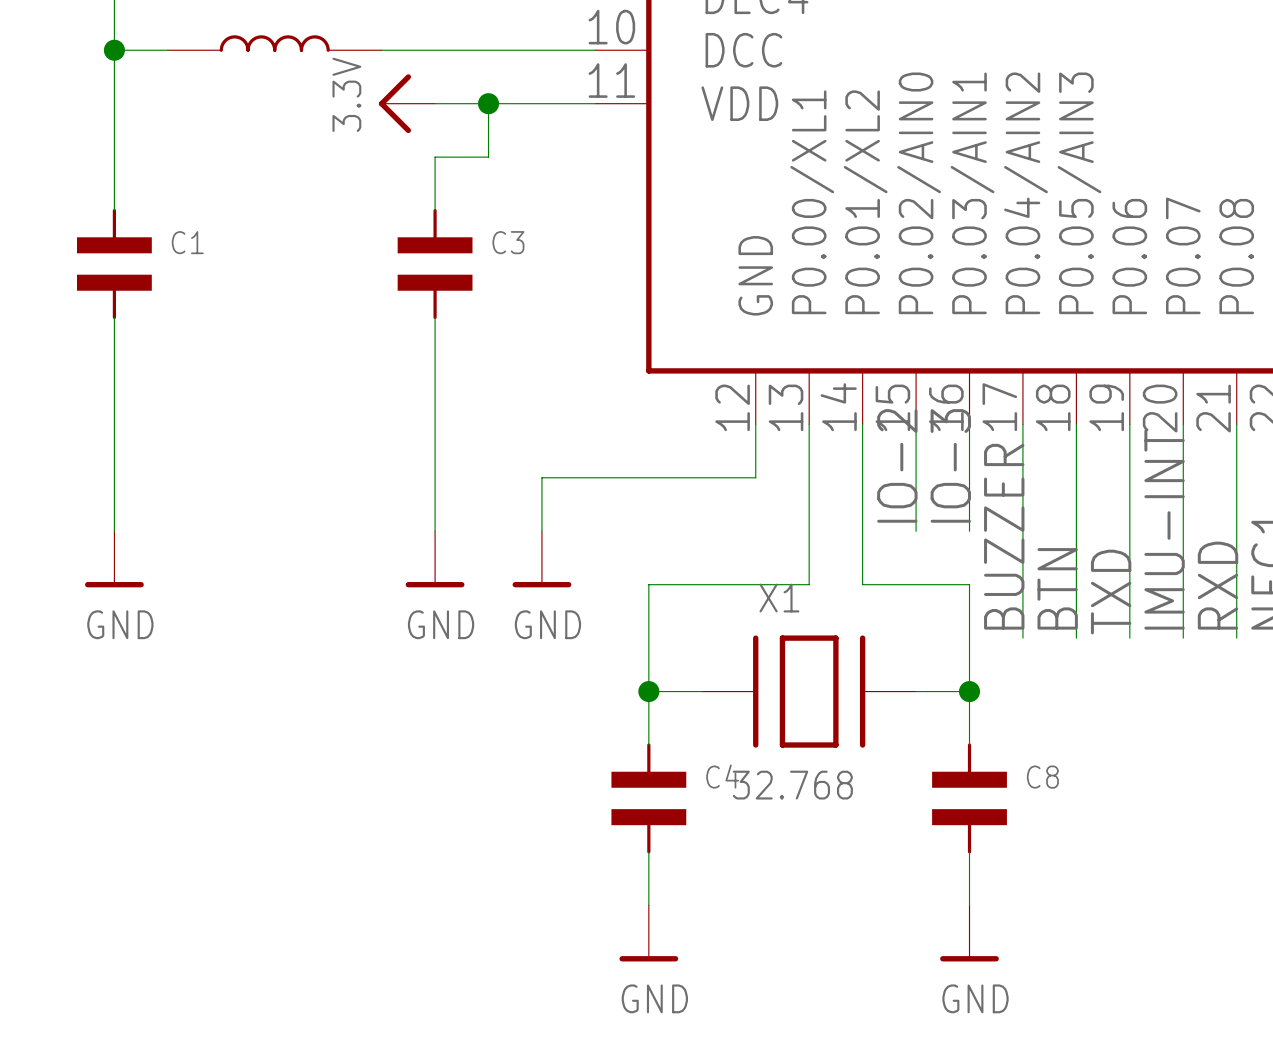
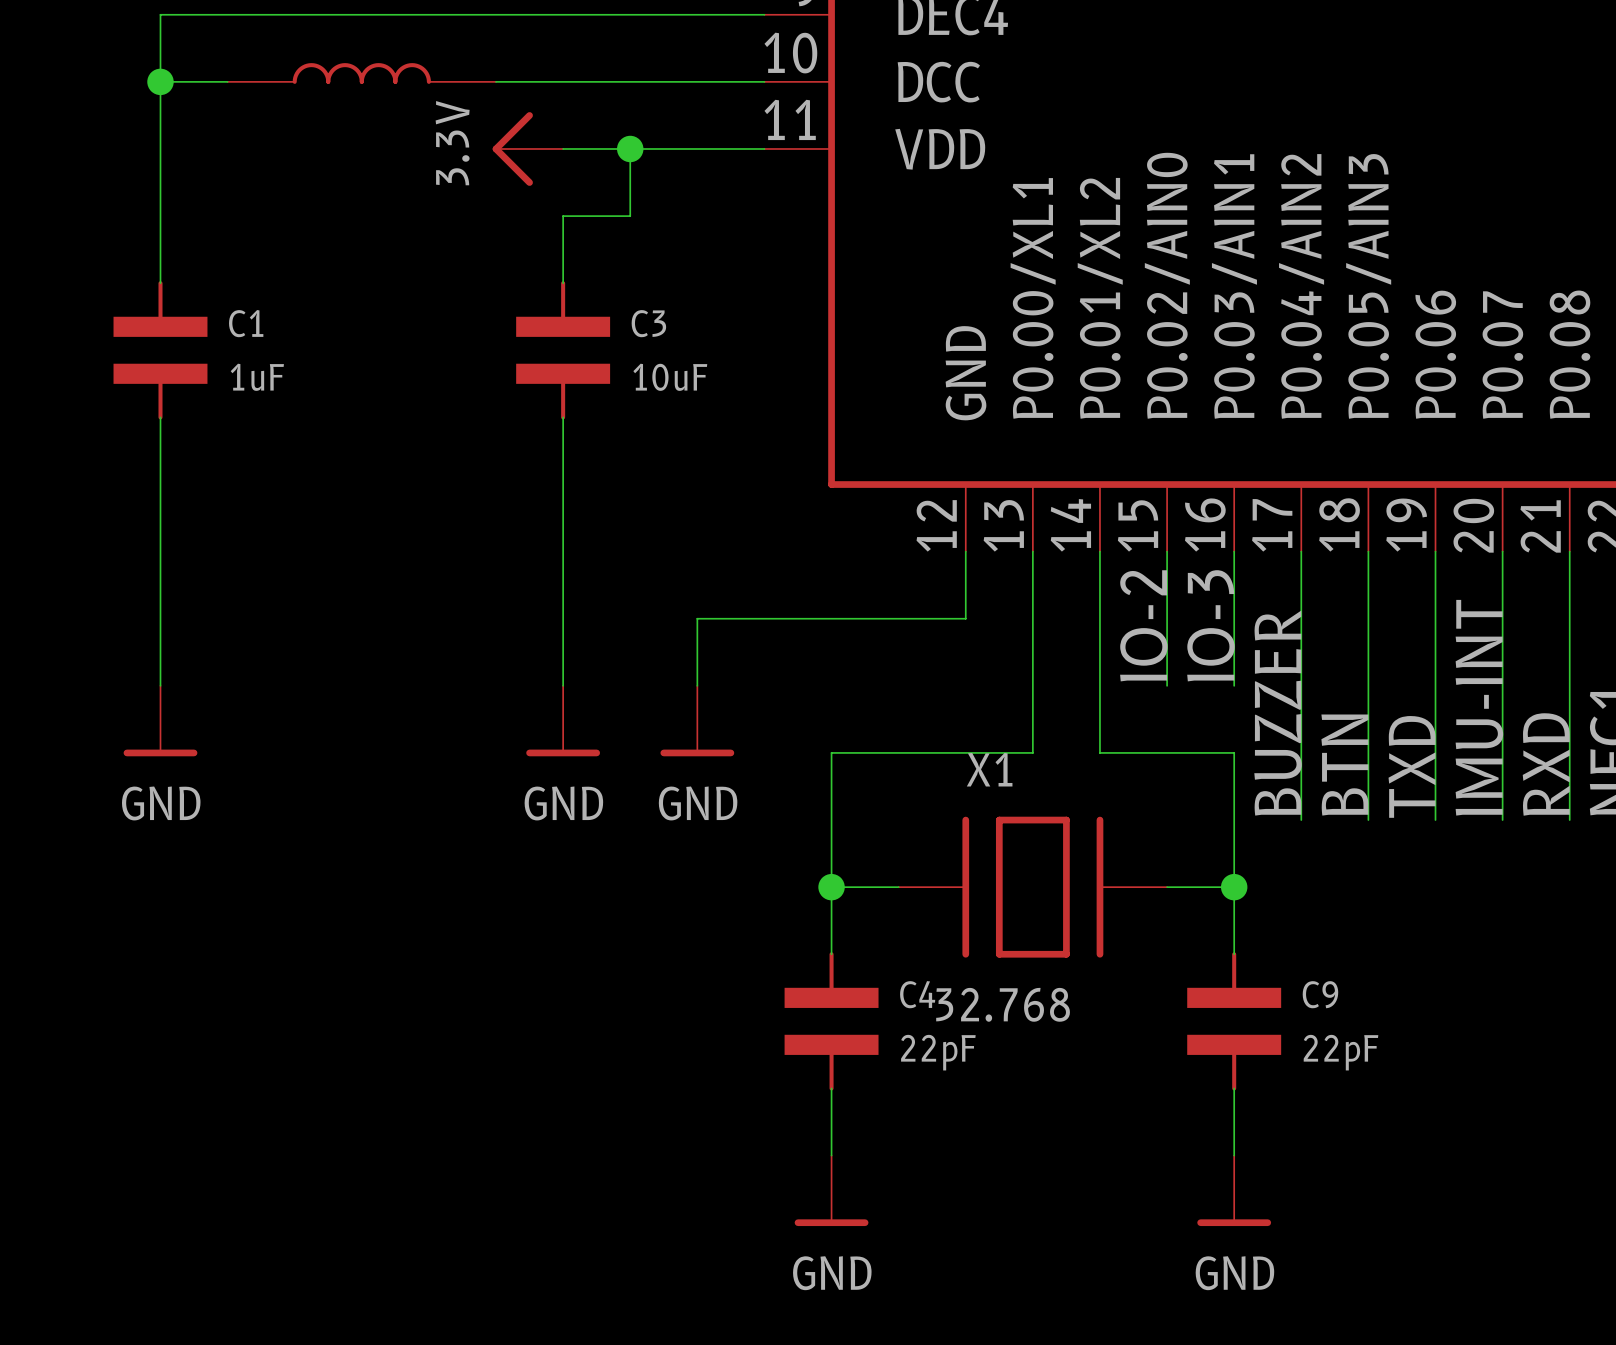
C1 value: none -> 1uF (257, 377)
C3 value: none -> 10uF (670, 377)
C8 name: C8 (1042, 777) -> C9 (1320, 994)
C4 value: none -> 22pF (938, 1052)
C8 value: none -> 22pF (1341, 1052)

